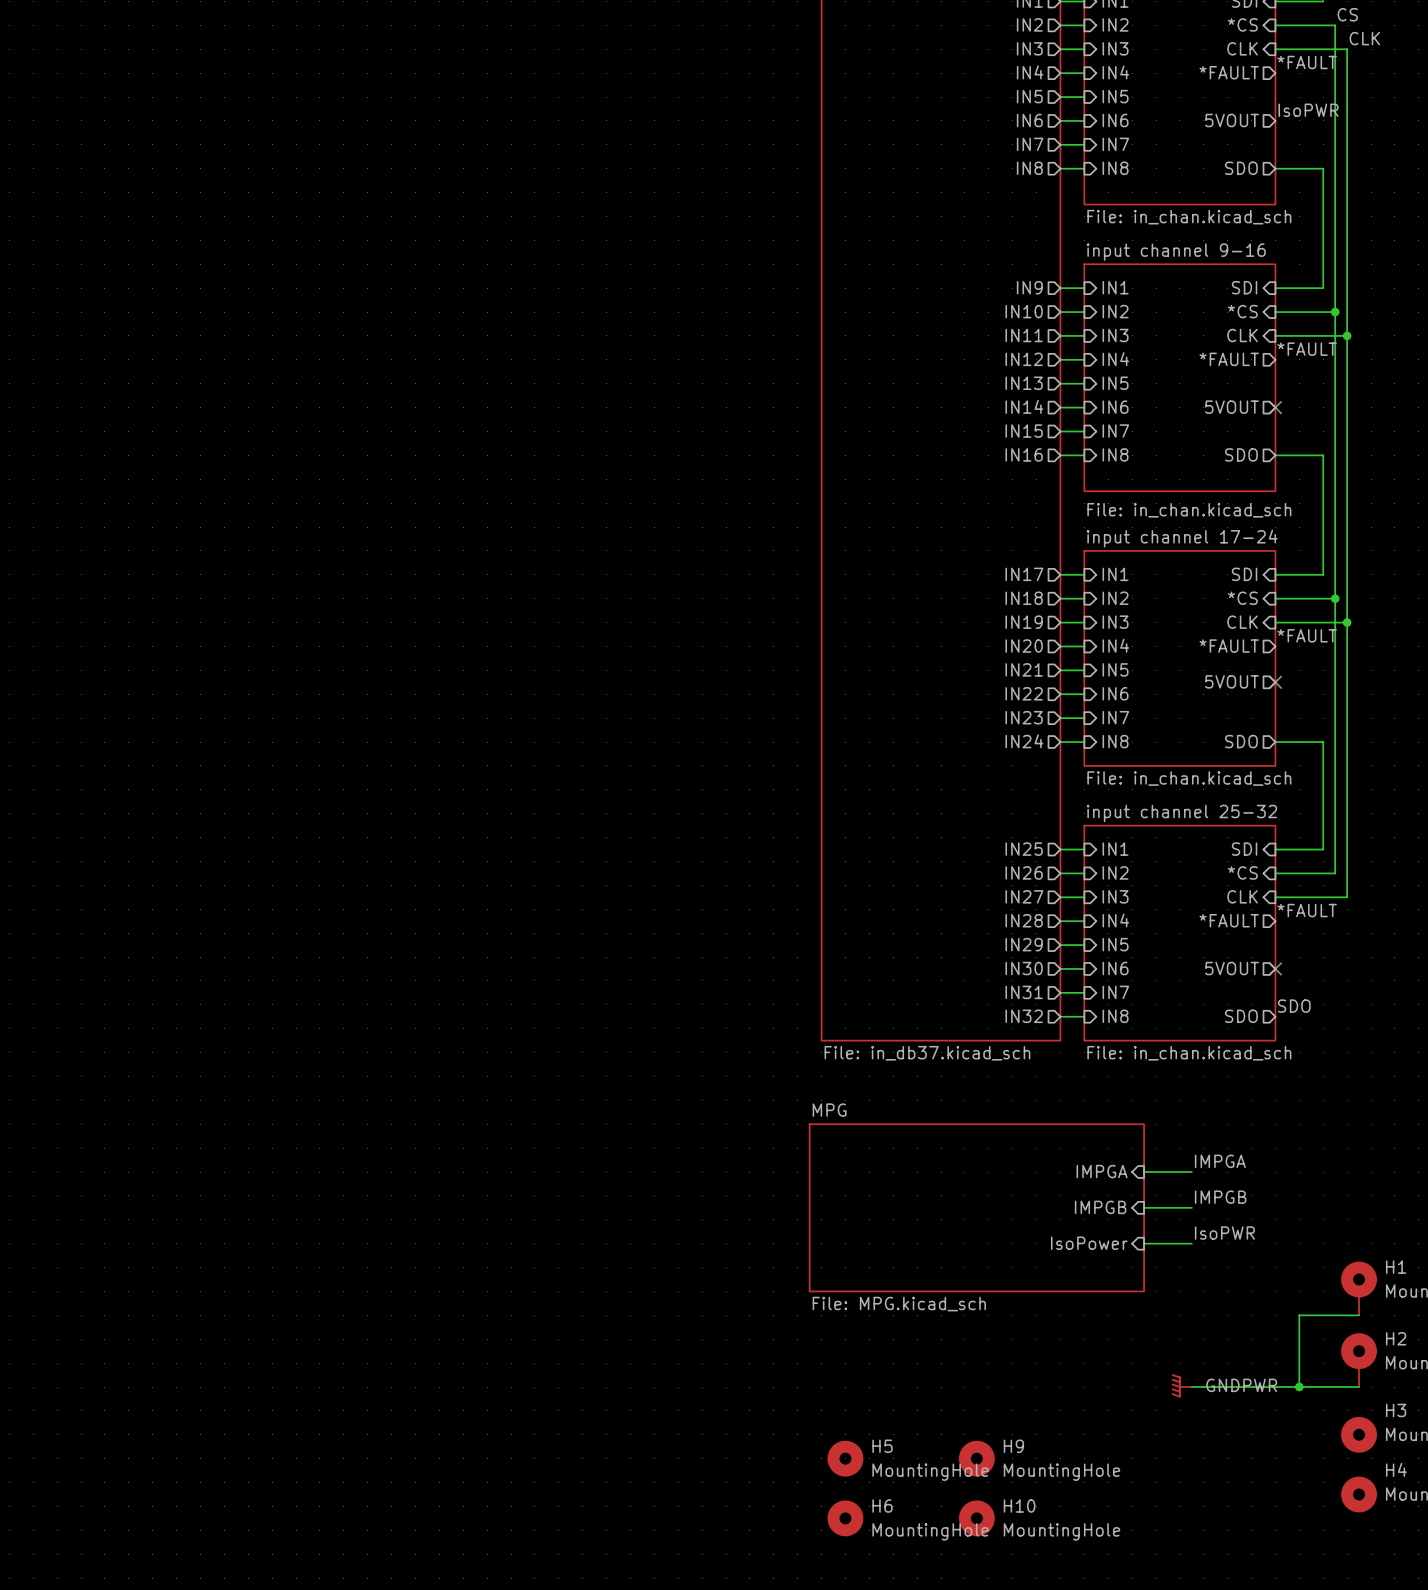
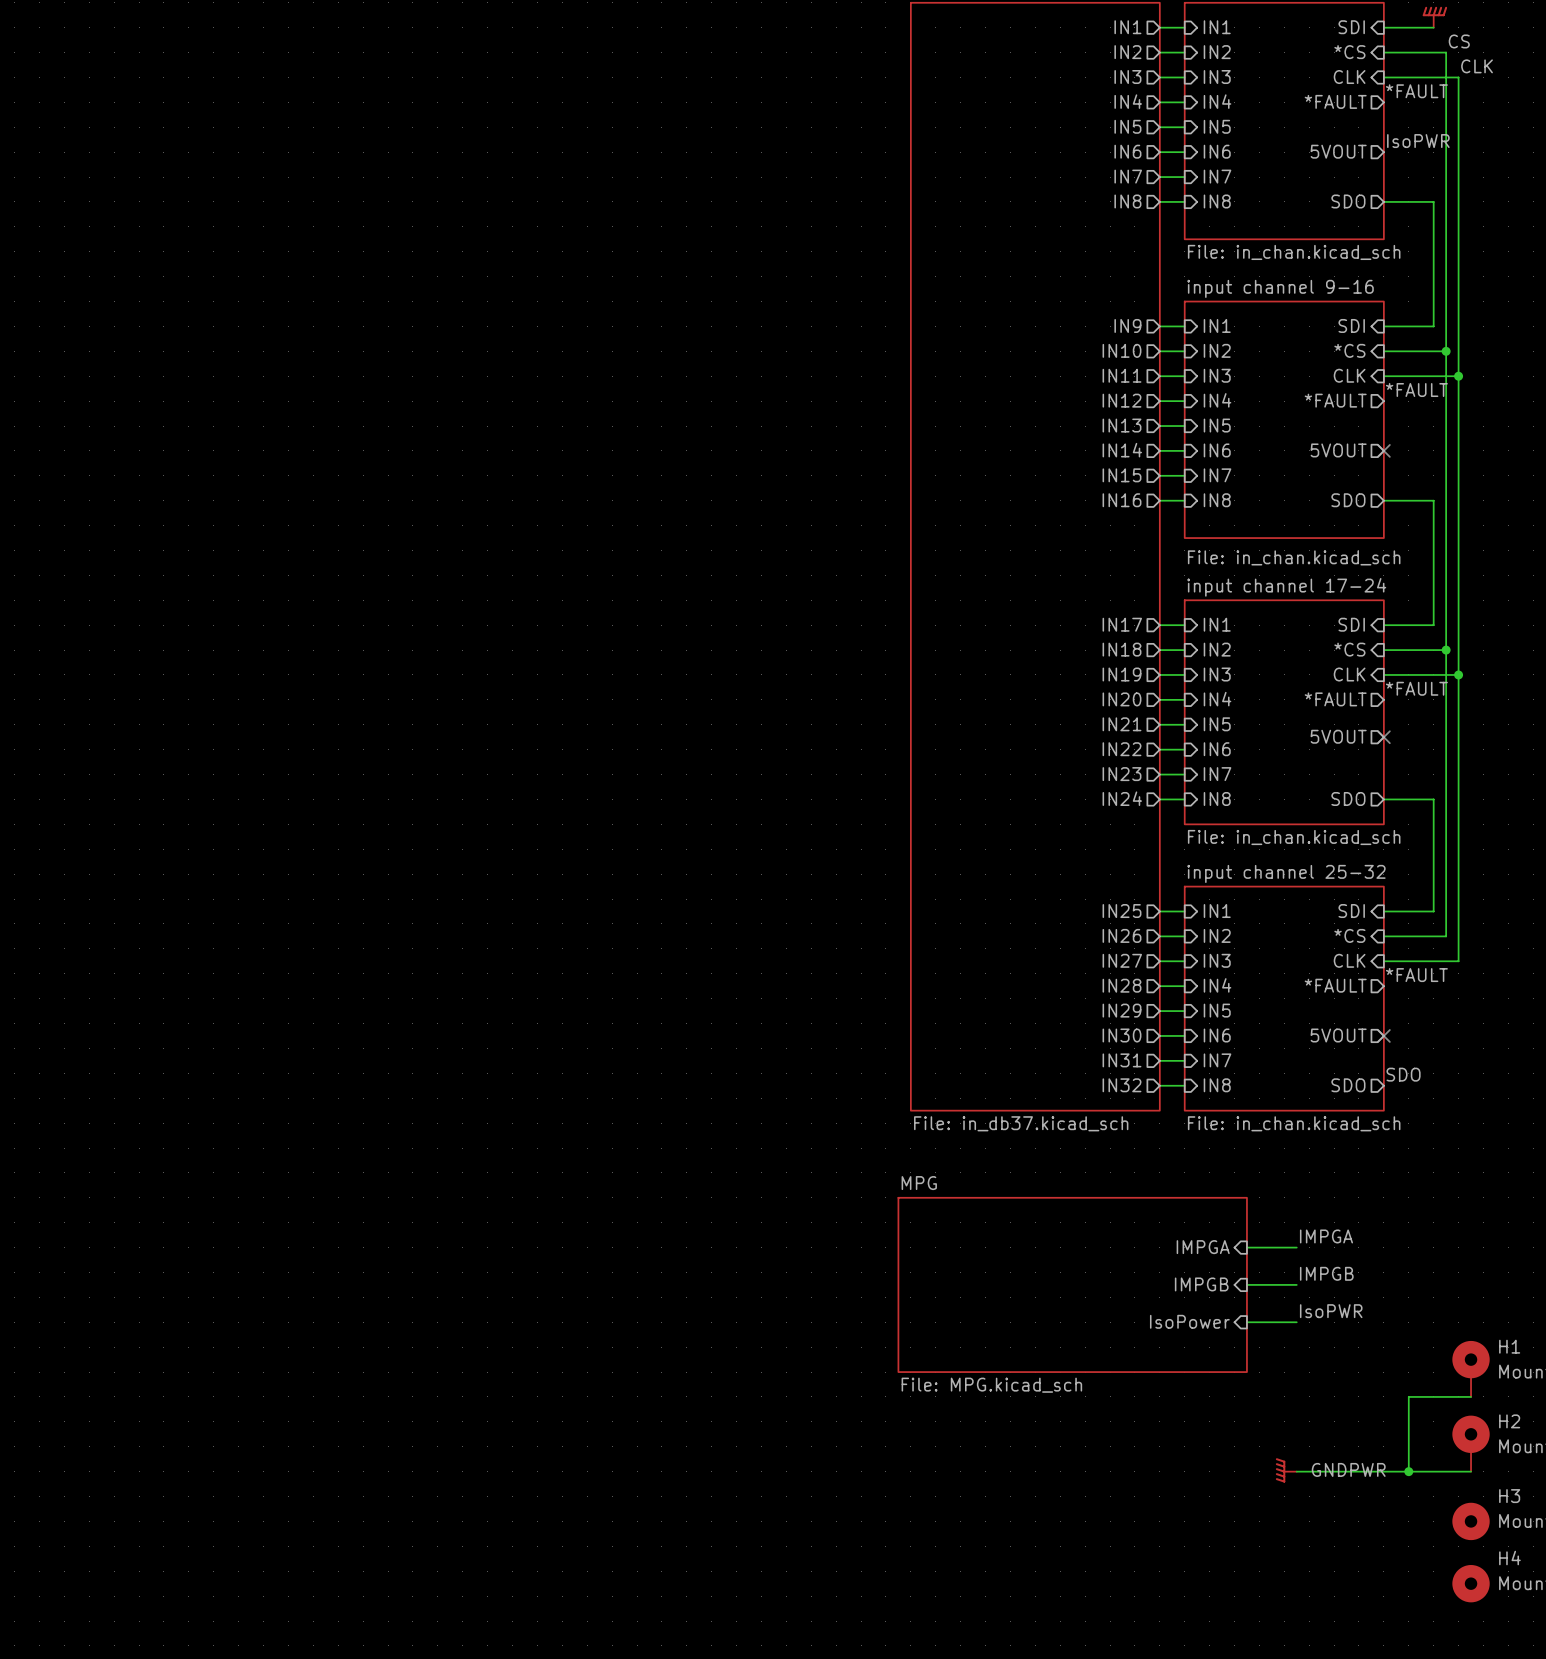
H5: MountingHole (845, 1458) -> none
H9: MountingHole (976, 1458) -> none
H6: MountingHole (845, 1518) -> none
H10: MountingHole (976, 1518) -> none

